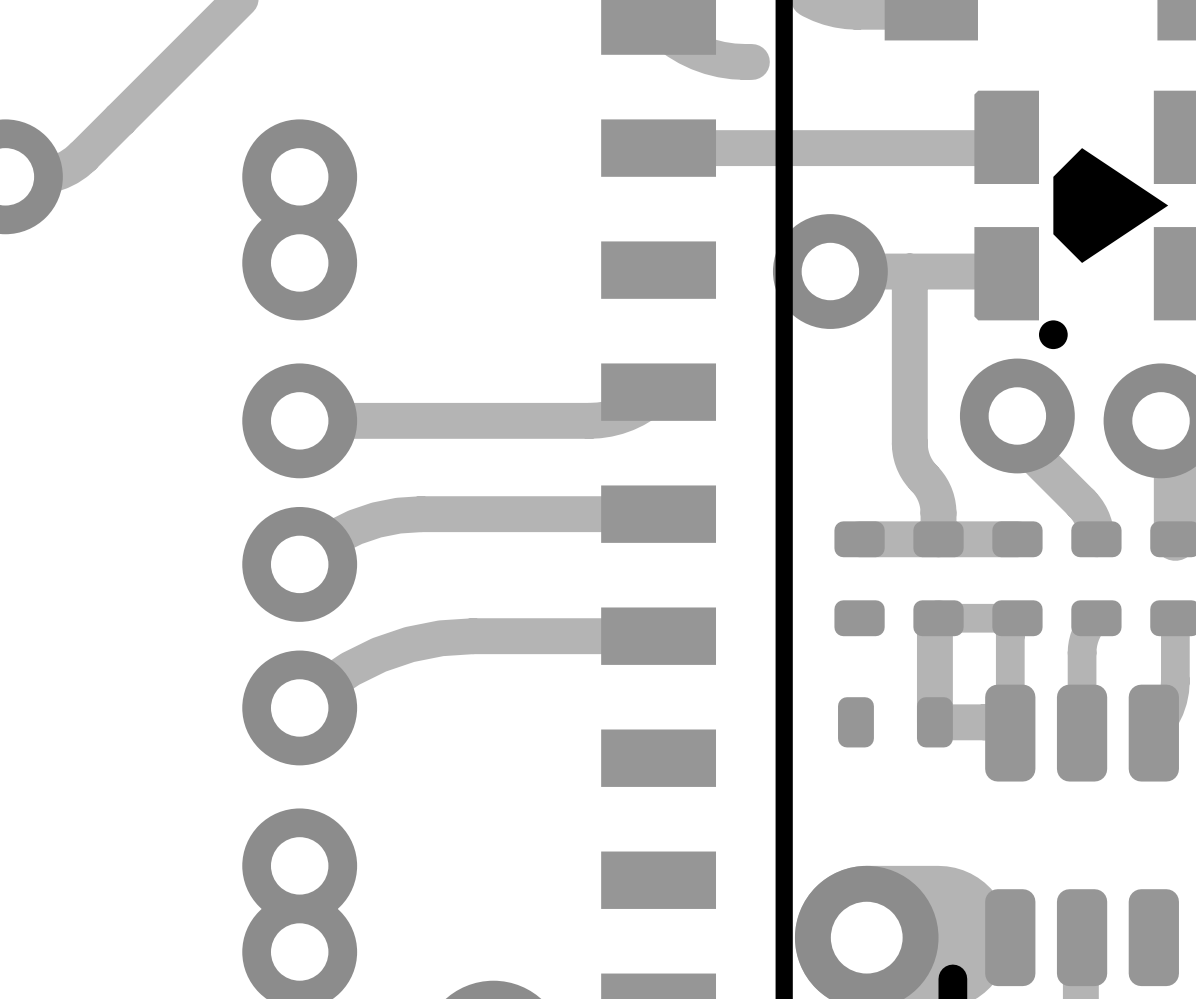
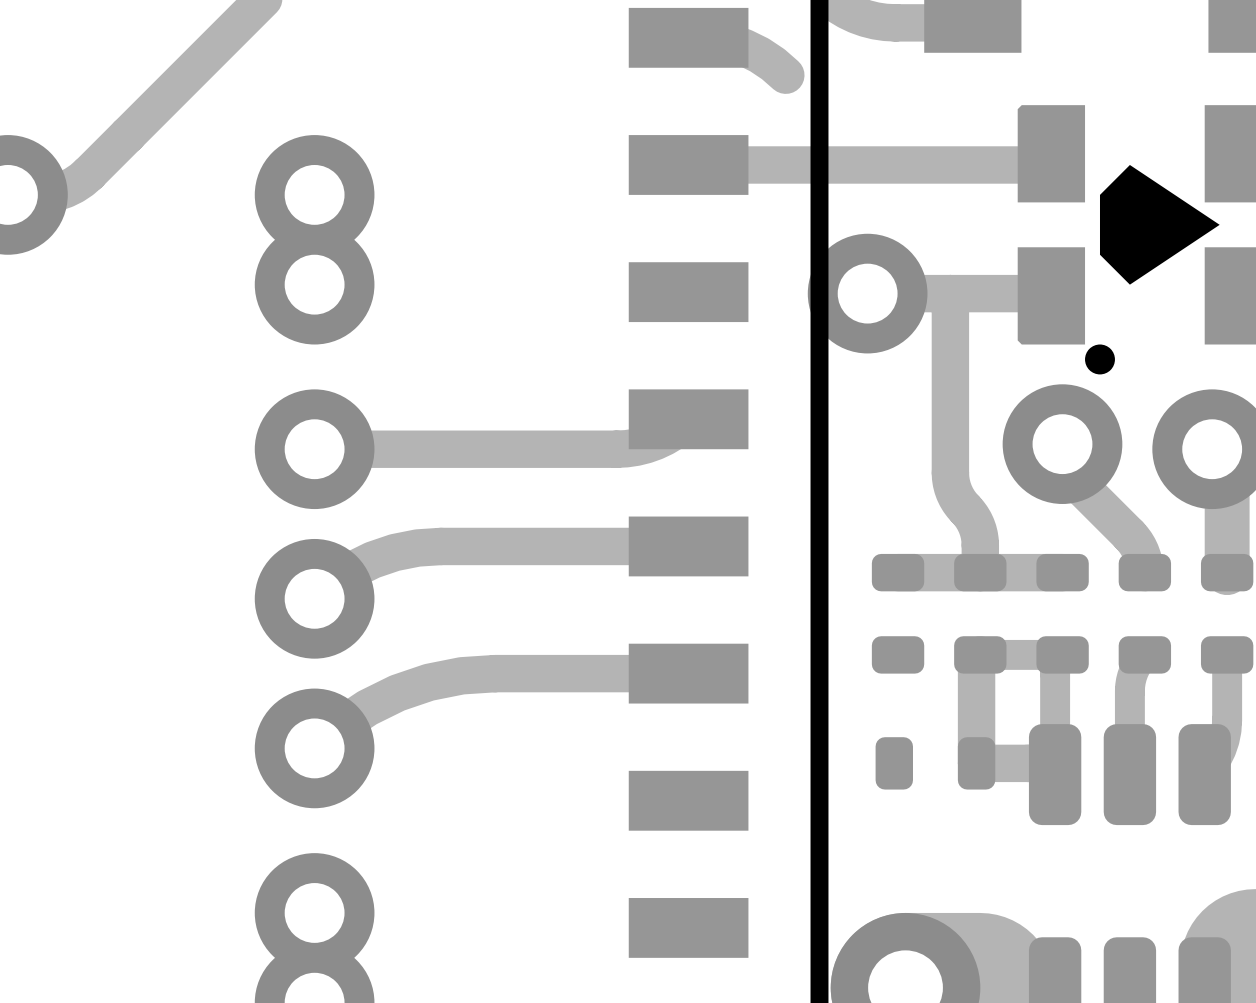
track: (658, 26) (677, 41) (698, 52) (721, 59) (751, 61) -> (695, 37) (712, 38) (744, 47) (759, 54) (785, 75)

